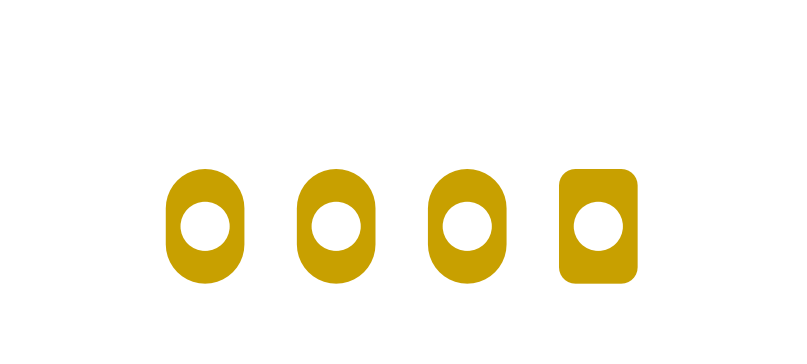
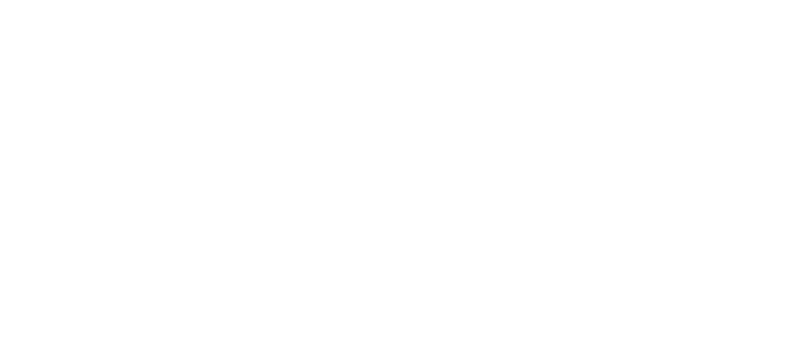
part: (401, 226) -> none

